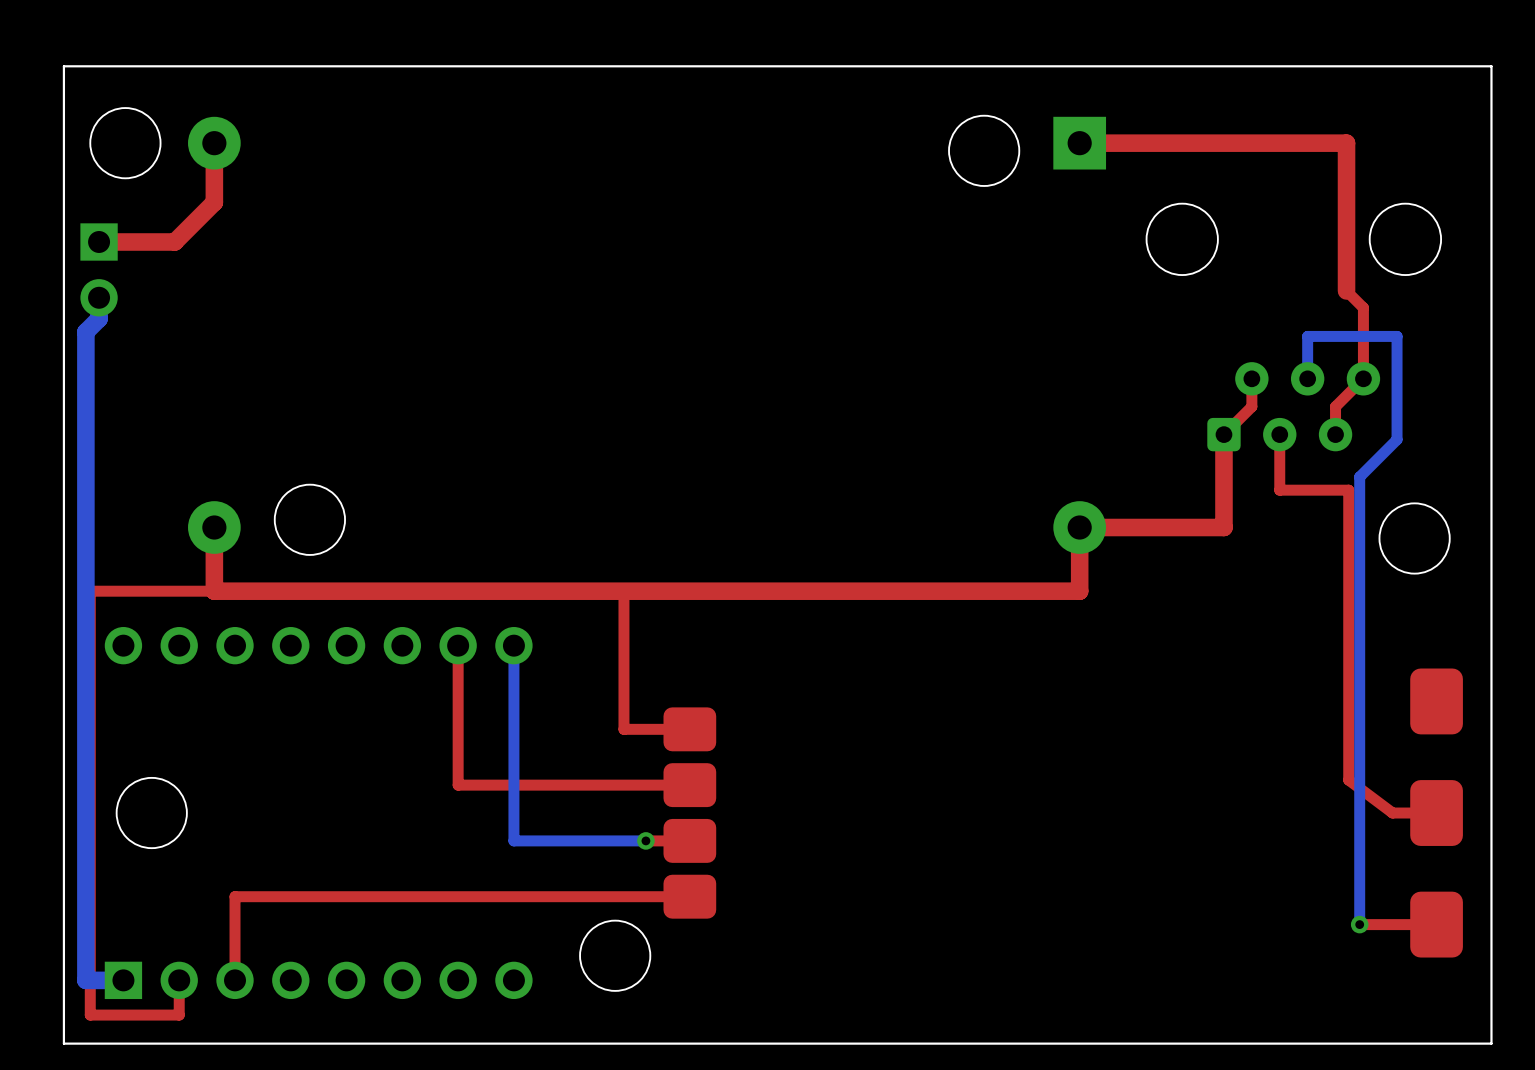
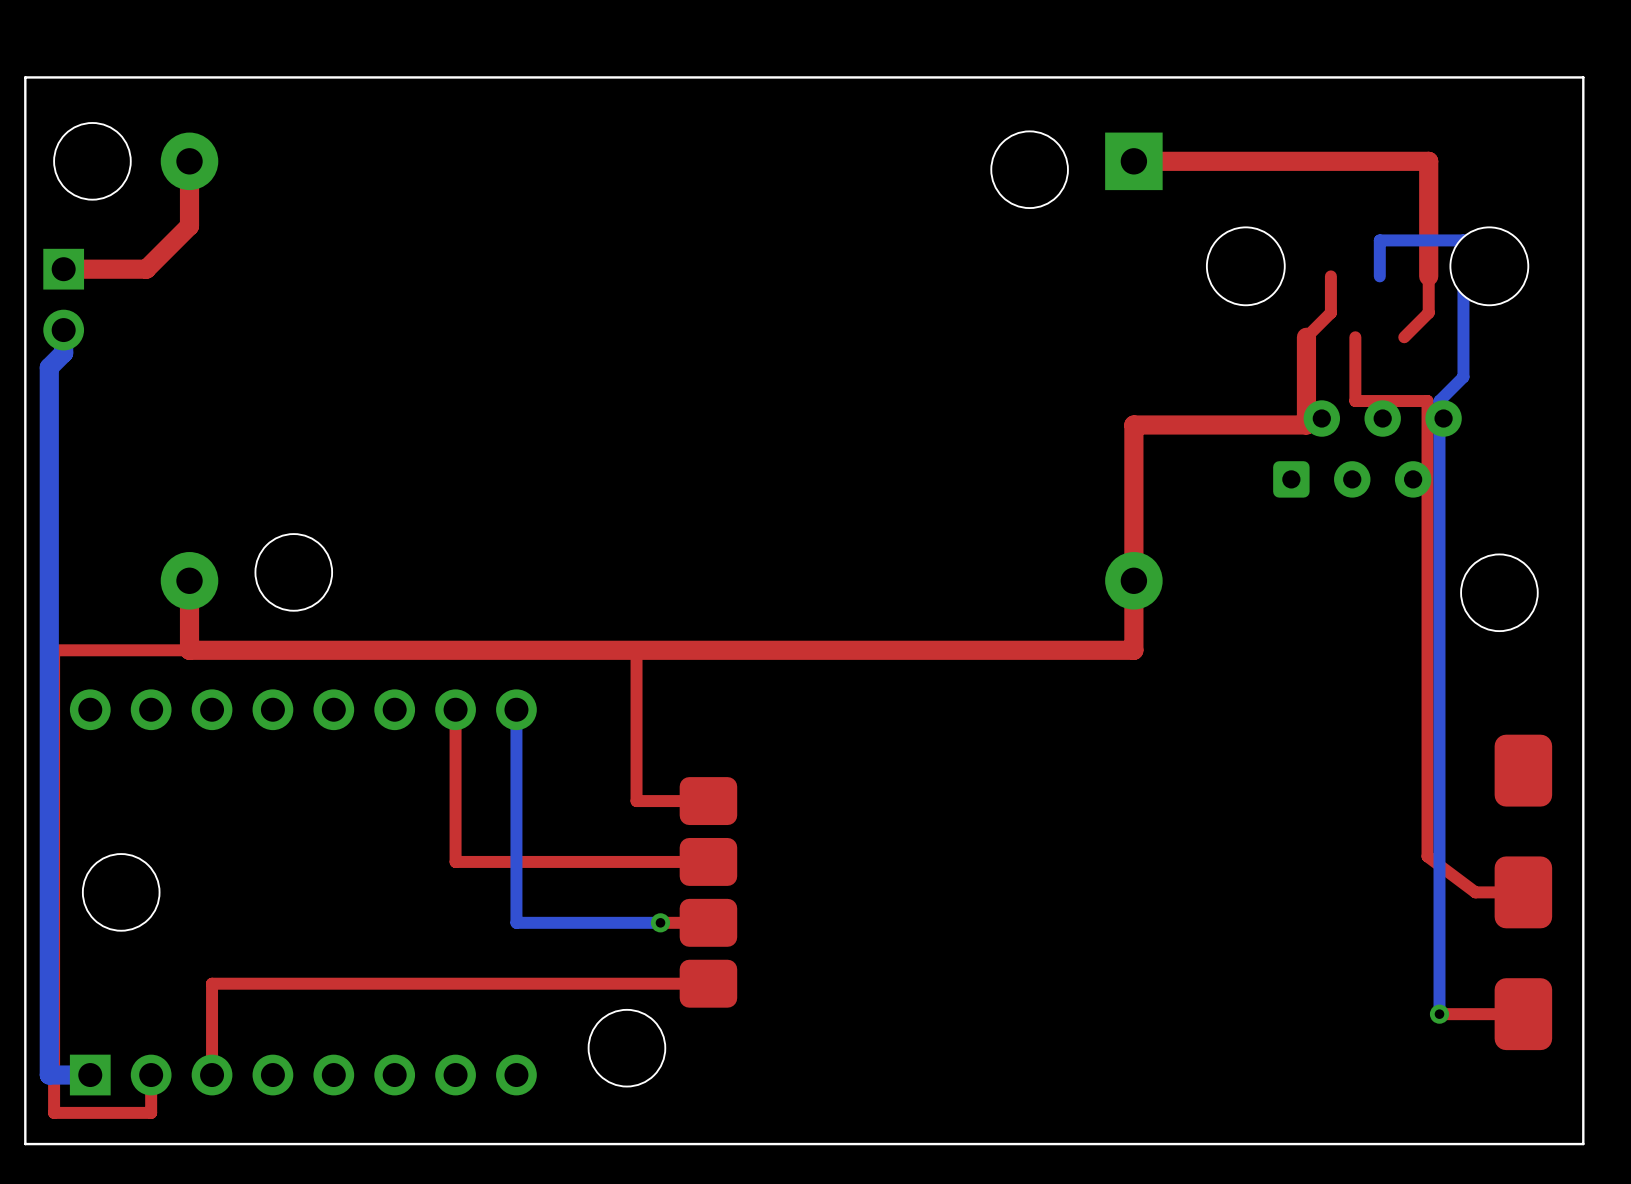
top track: (1346, 143) (1346, 290) (1363, 307) (1363, 378) (1335, 406) (1335, 434) -> (1425, 161) (1428, 161) (1428, 312) (1404, 337)
top track: (1251, 378) (1251, 406) (1223, 434) (1223, 527) (1079, 527) -> (1330, 276) (1330, 312) (1306, 337) (1306, 424) (1133, 424) (1133, 580)
bottom track: (1307, 378) (1307, 336) (1397, 336) (1397, 439) (1359, 476) -> (1379, 276) (1379, 240) (1463, 240) (1463, 377) (1439, 401) (1439, 525)
top track: (1279, 434) (1279, 490) (1348, 490) -> (1355, 337) (1355, 401) (1427, 401) (1427, 540)

